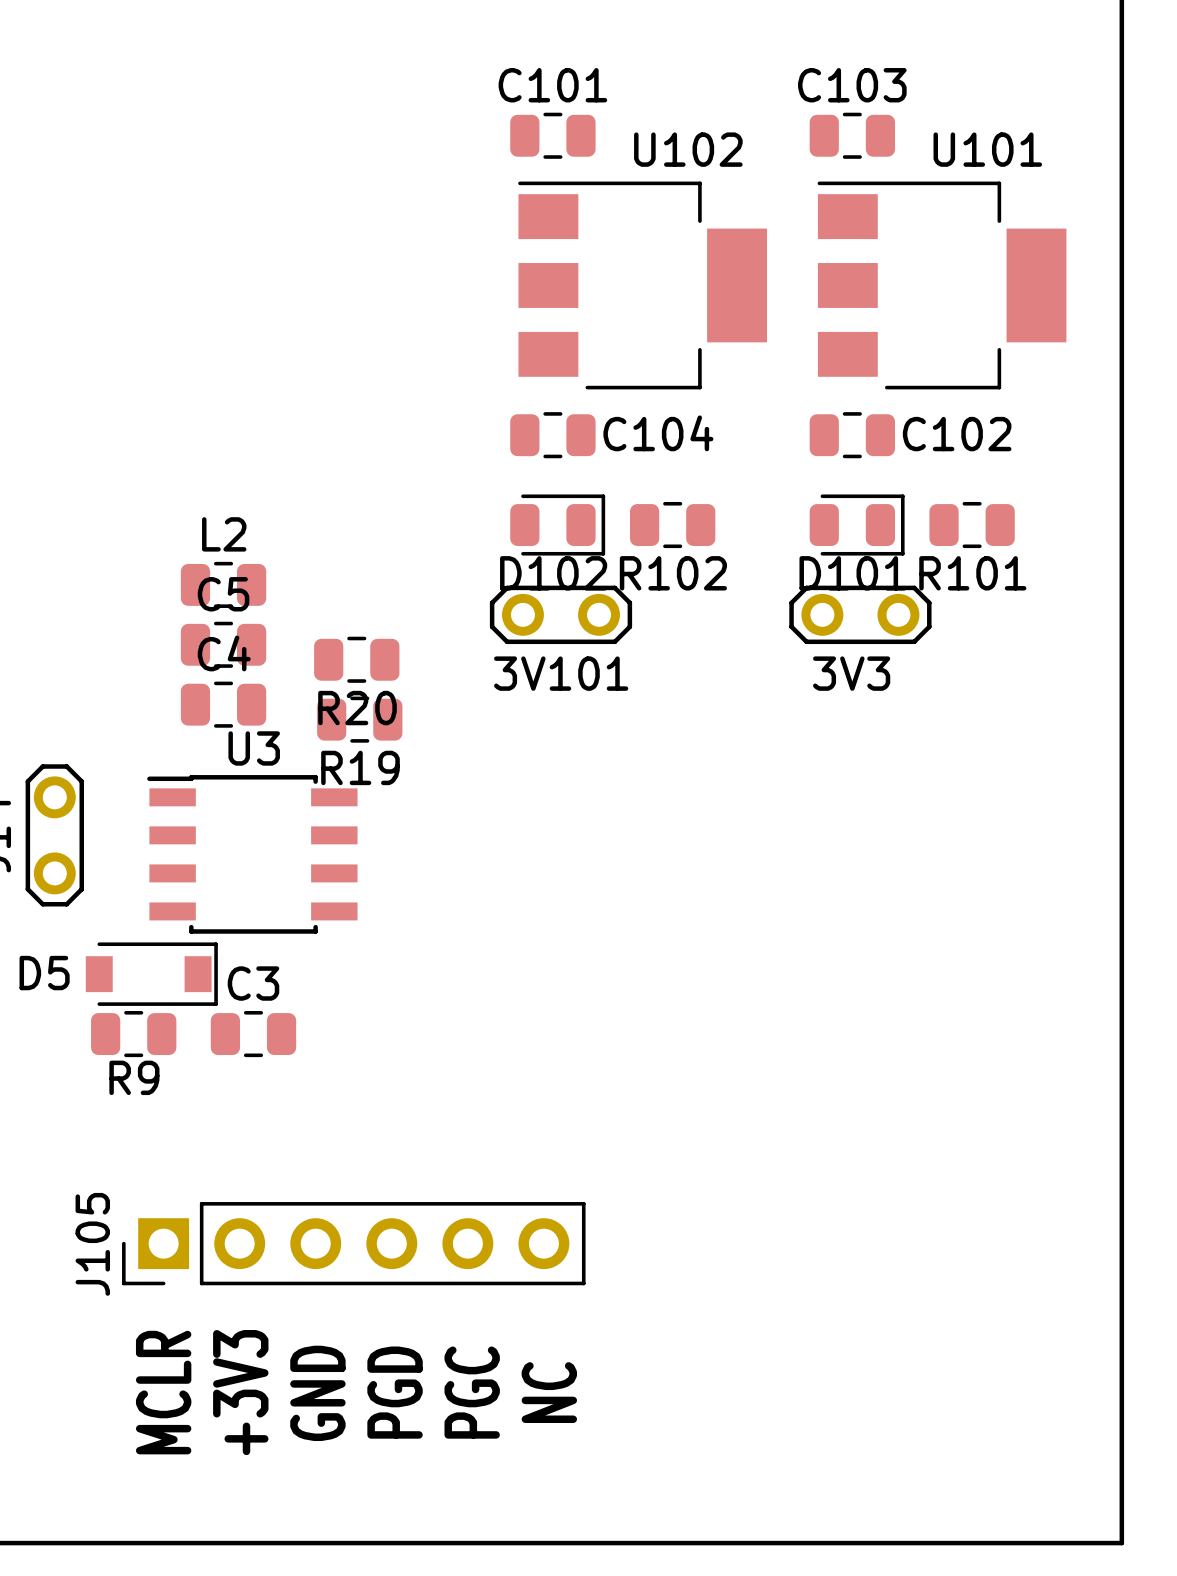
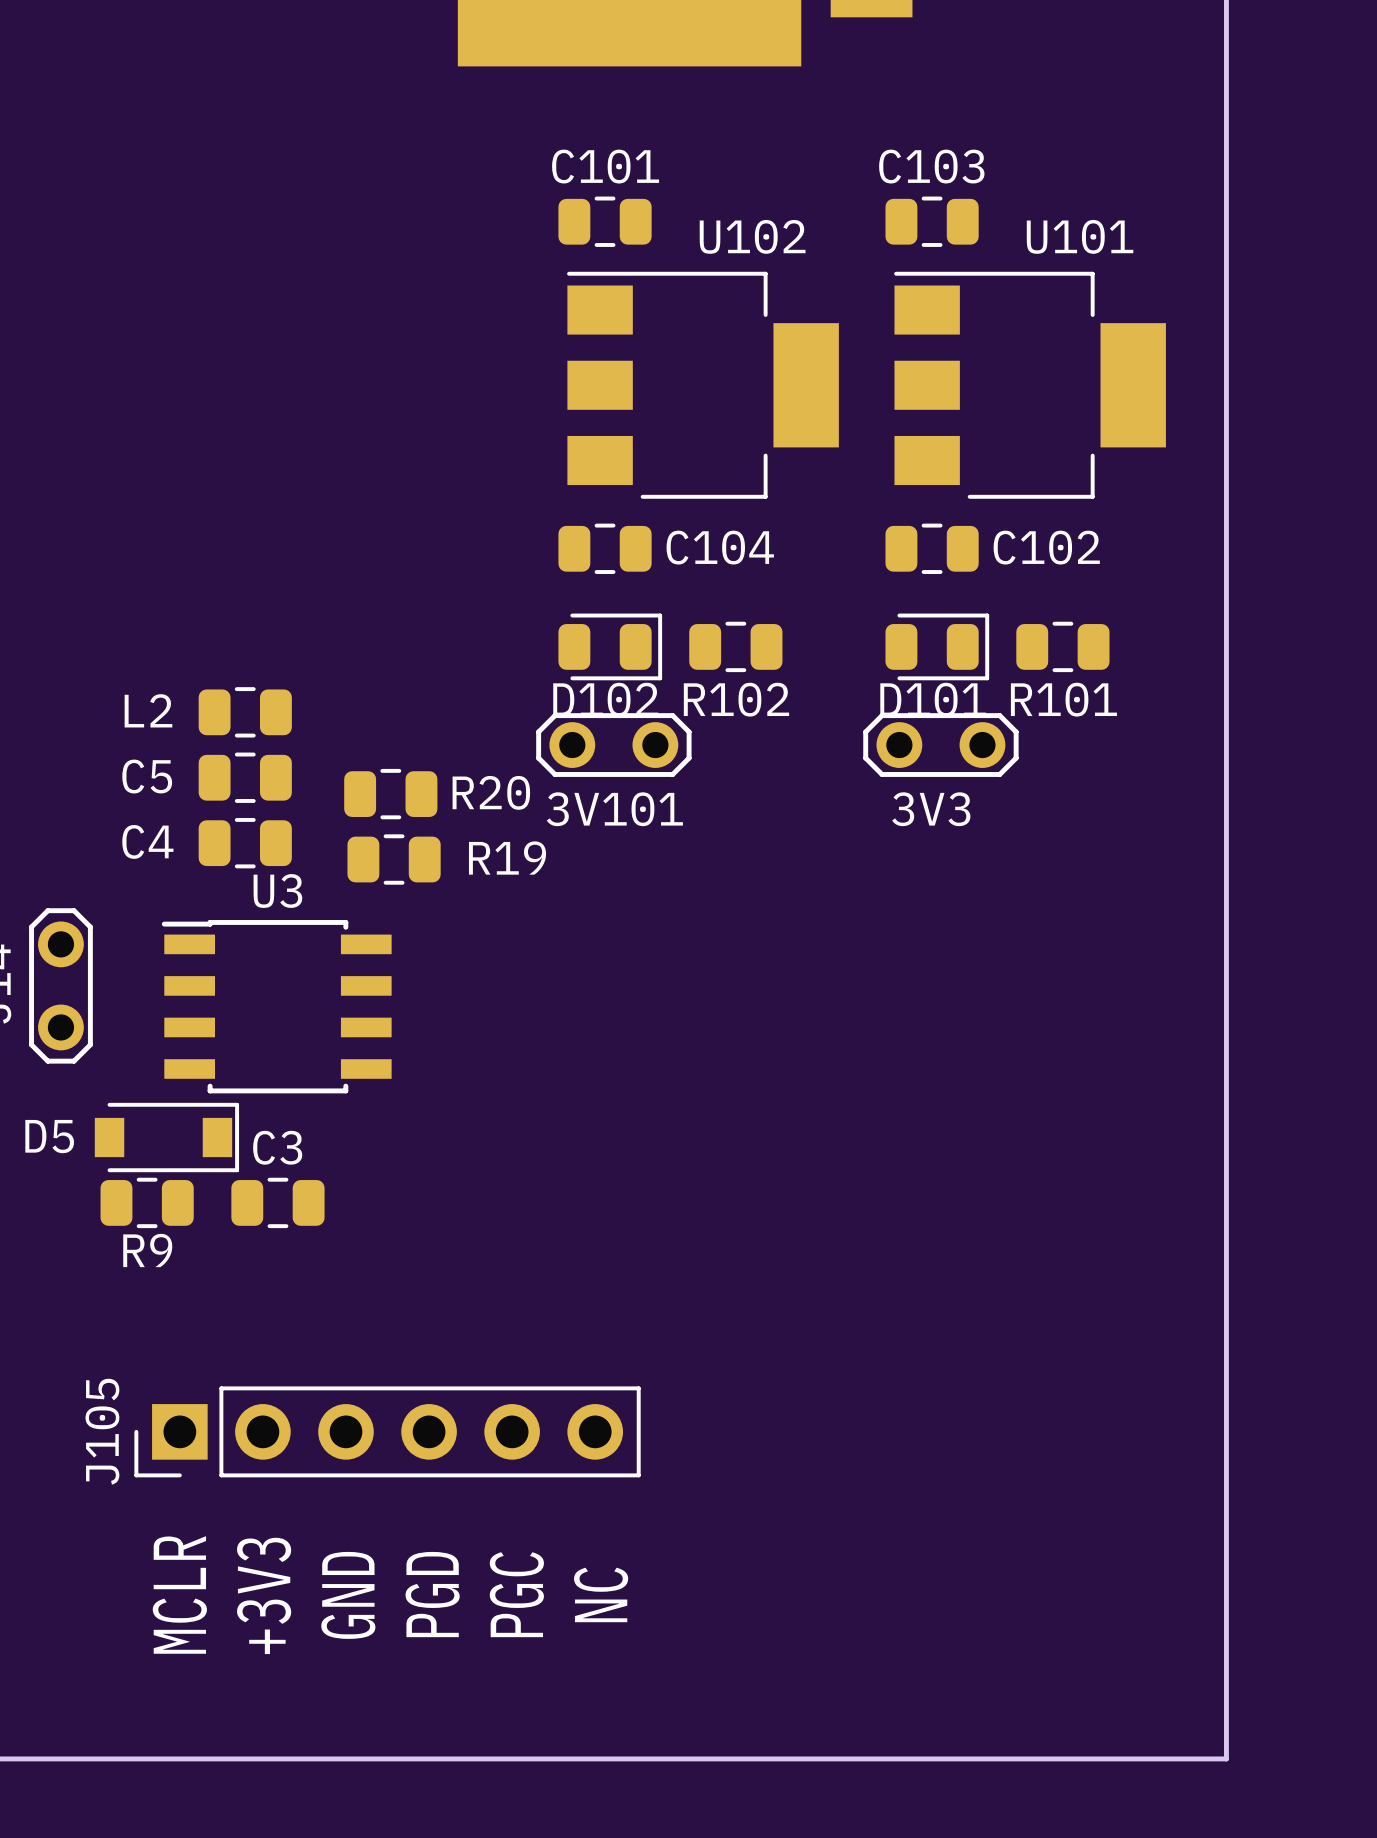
L2 name position: L2 (224, 534) -> L2 (148, 710)
C5 name position: C5 (223, 594) -> C5 (147, 776)
C4 name position: C4 (224, 653) -> C4 (147, 841)
R20 name position: R20 (357, 708) -> R20 (491, 792)
R19 name position: R19 (360, 767) -> R19 (507, 858)

